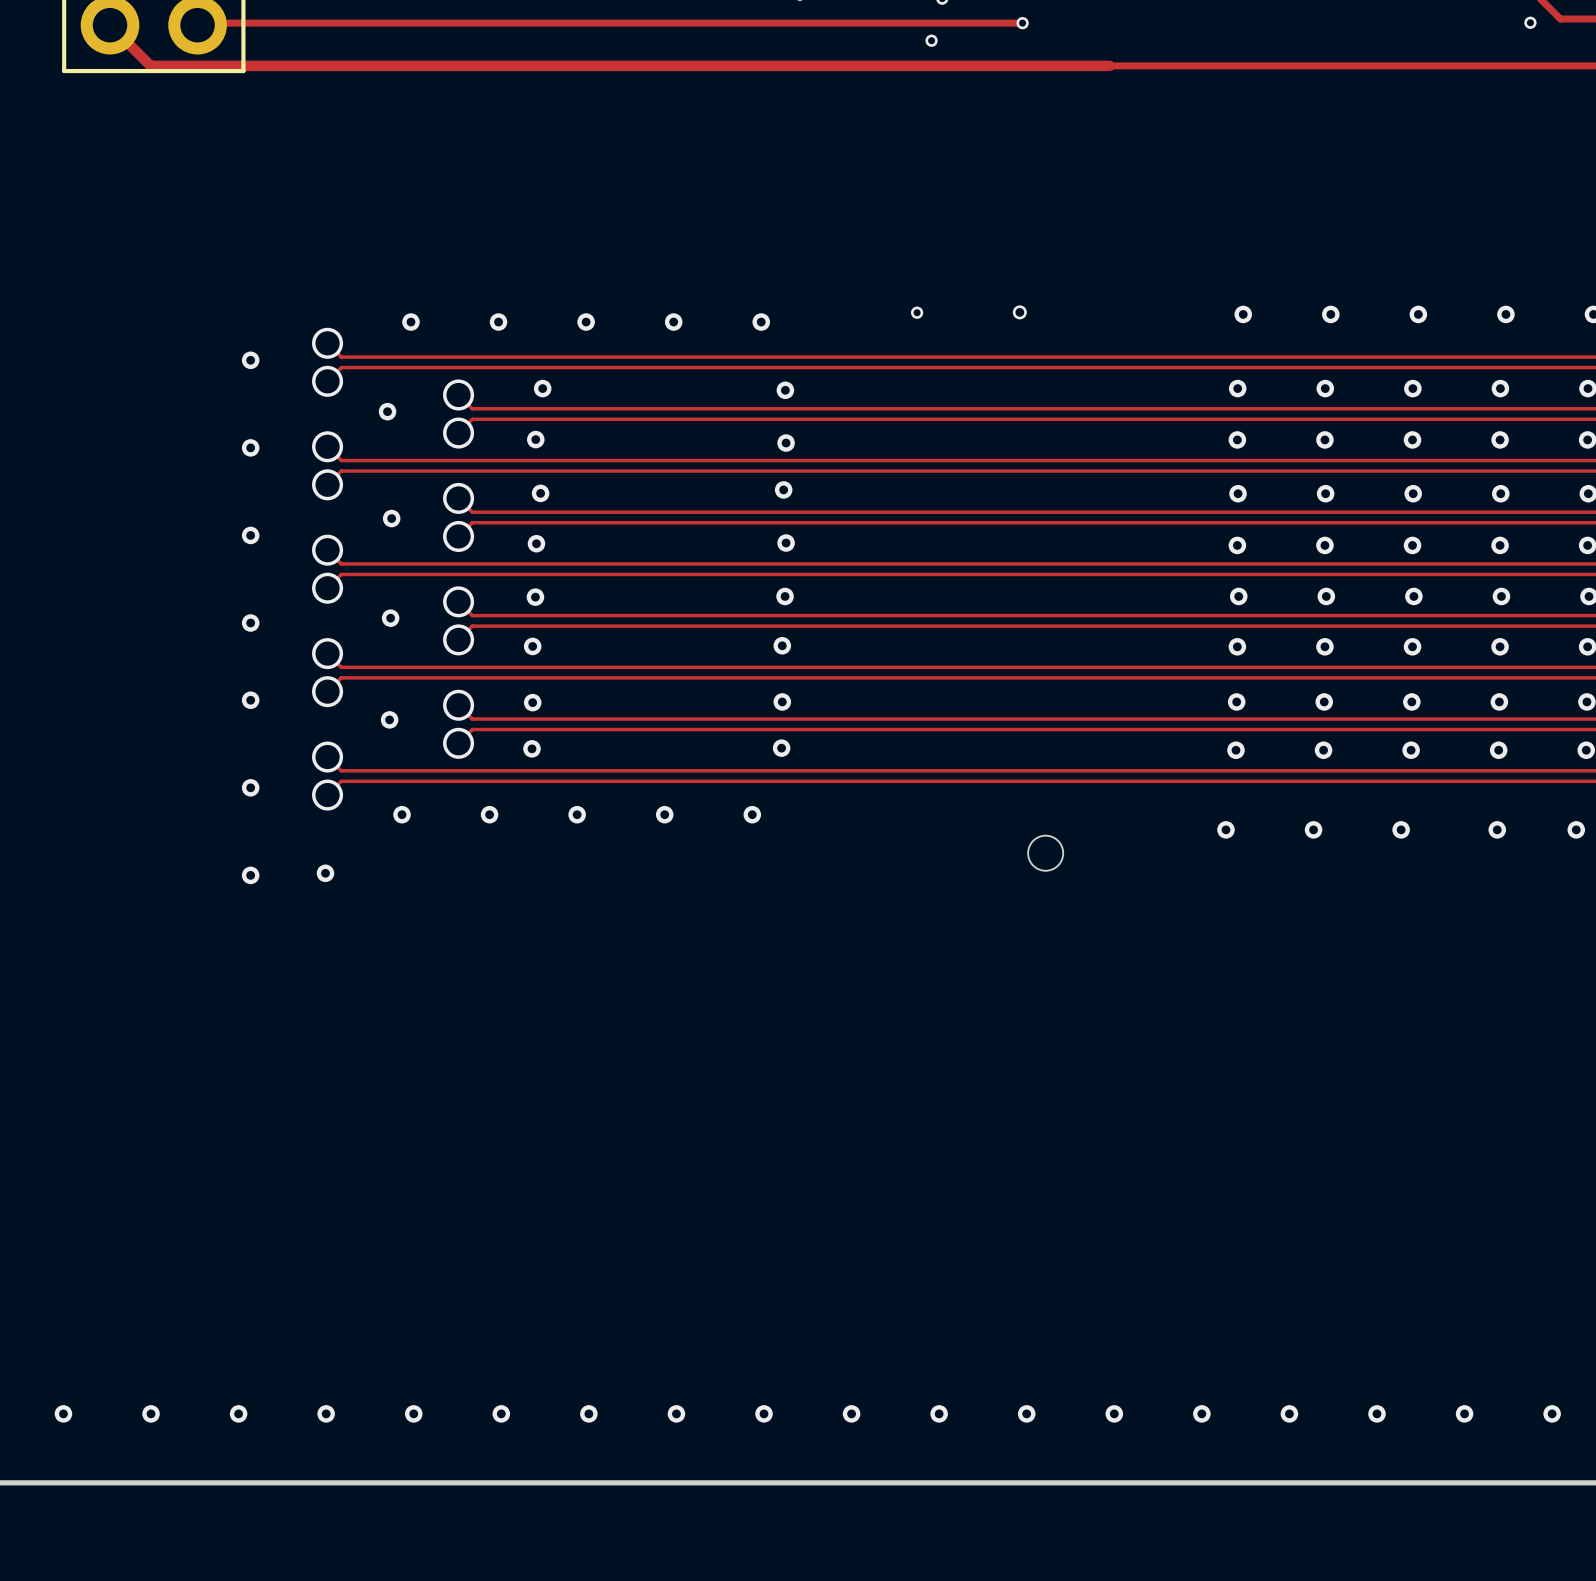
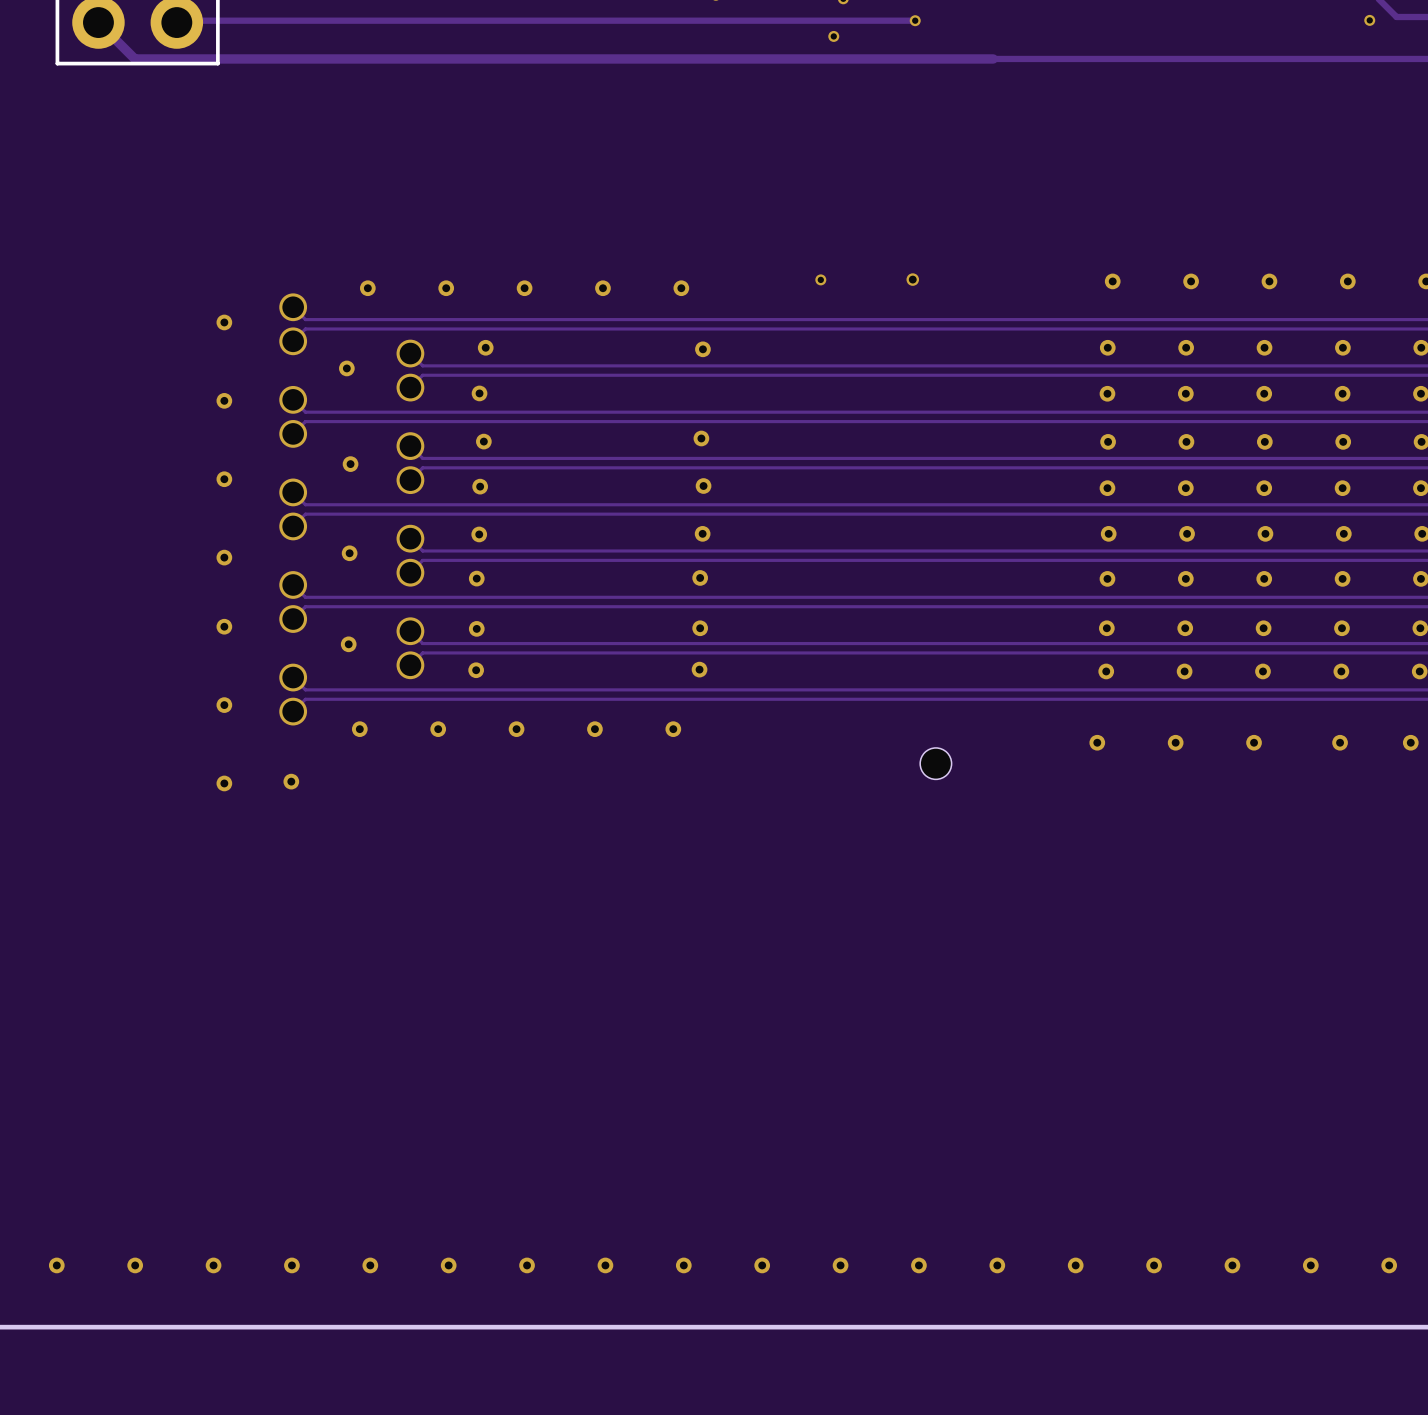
via: (786, 443) -> none

